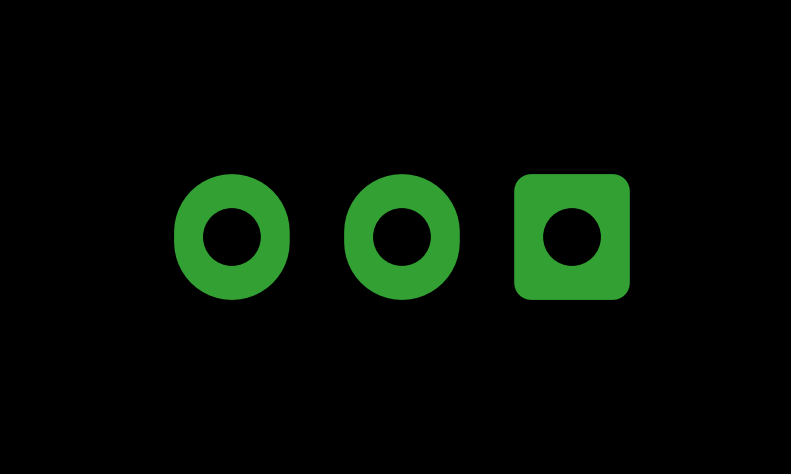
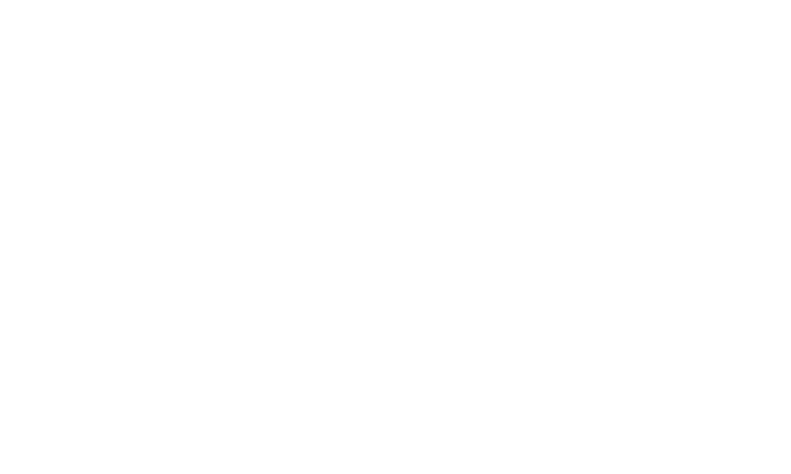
part: (401, 237) -> none

